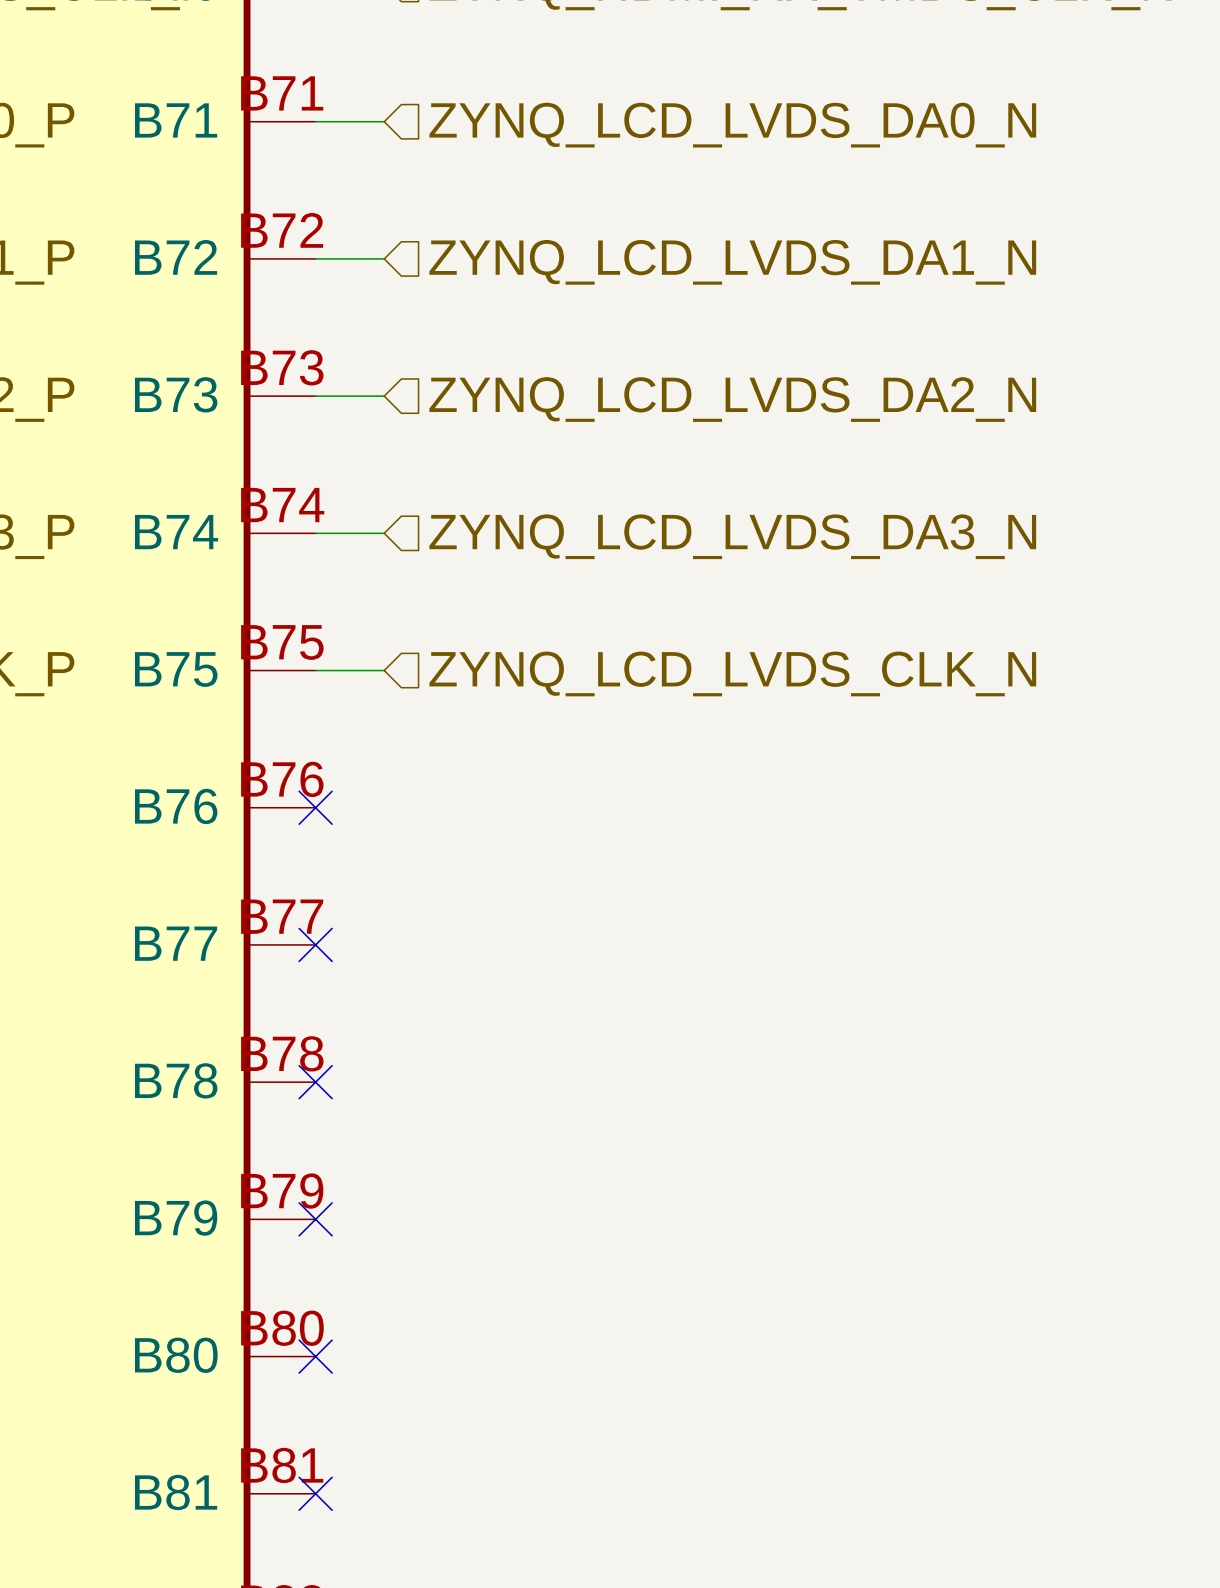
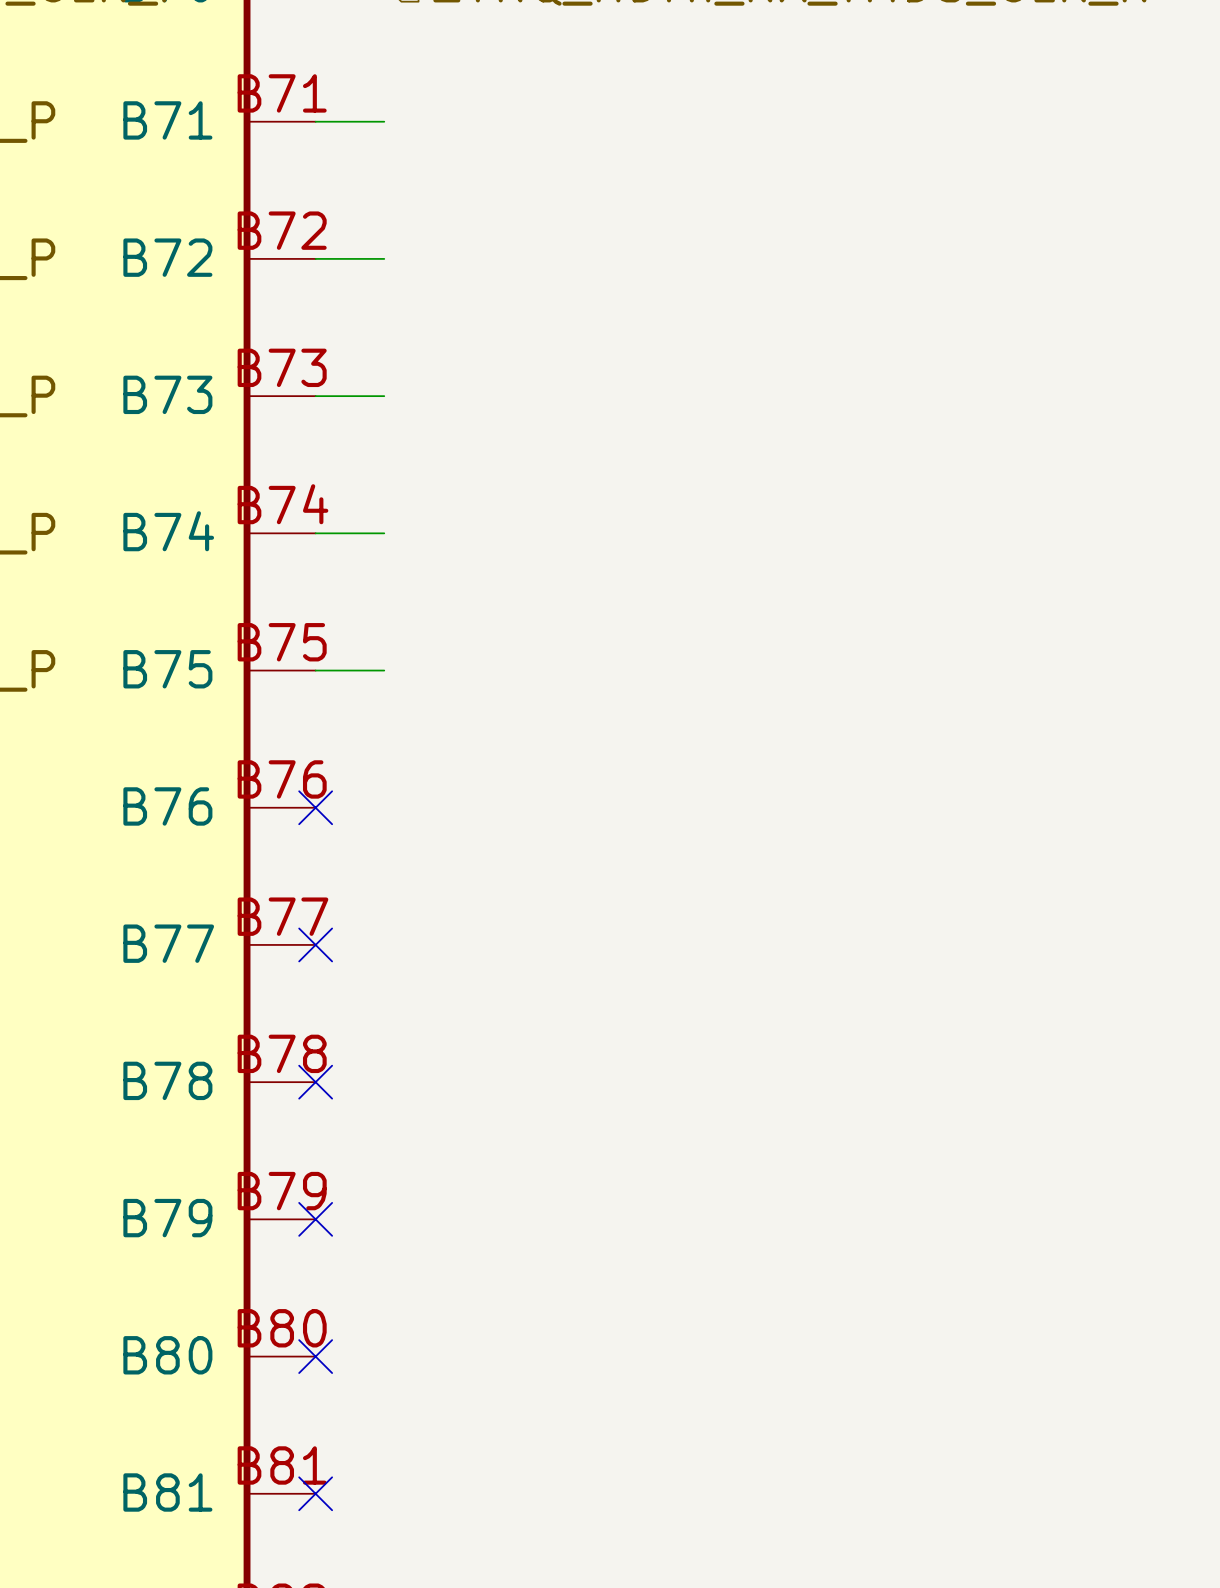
hierarchical label: ZYNQ_LCD_LVDS_DA0_N (732, 125) -> none
hierarchical label: ZYNQ_LCD_LVDS_DA1_N (732, 262) -> none
hierarchical label: ZYNQ_LCD_LVDS_DA2_N (732, 399) -> none
hierarchical label: ZYNQ_LCD_LVDS_DA3_N (732, 536) -> none
hierarchical label: ZYNQ_LCD_LVDS_CLK_N (732, 673) -> none

